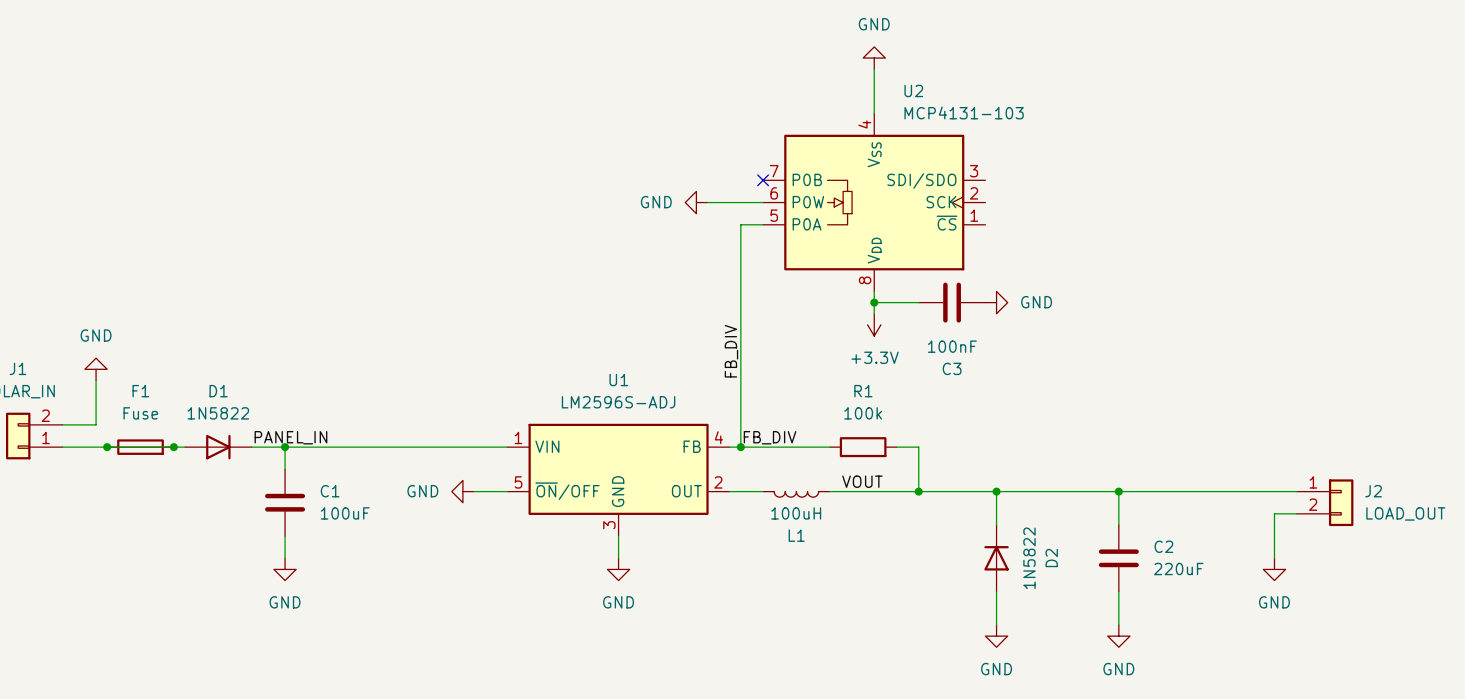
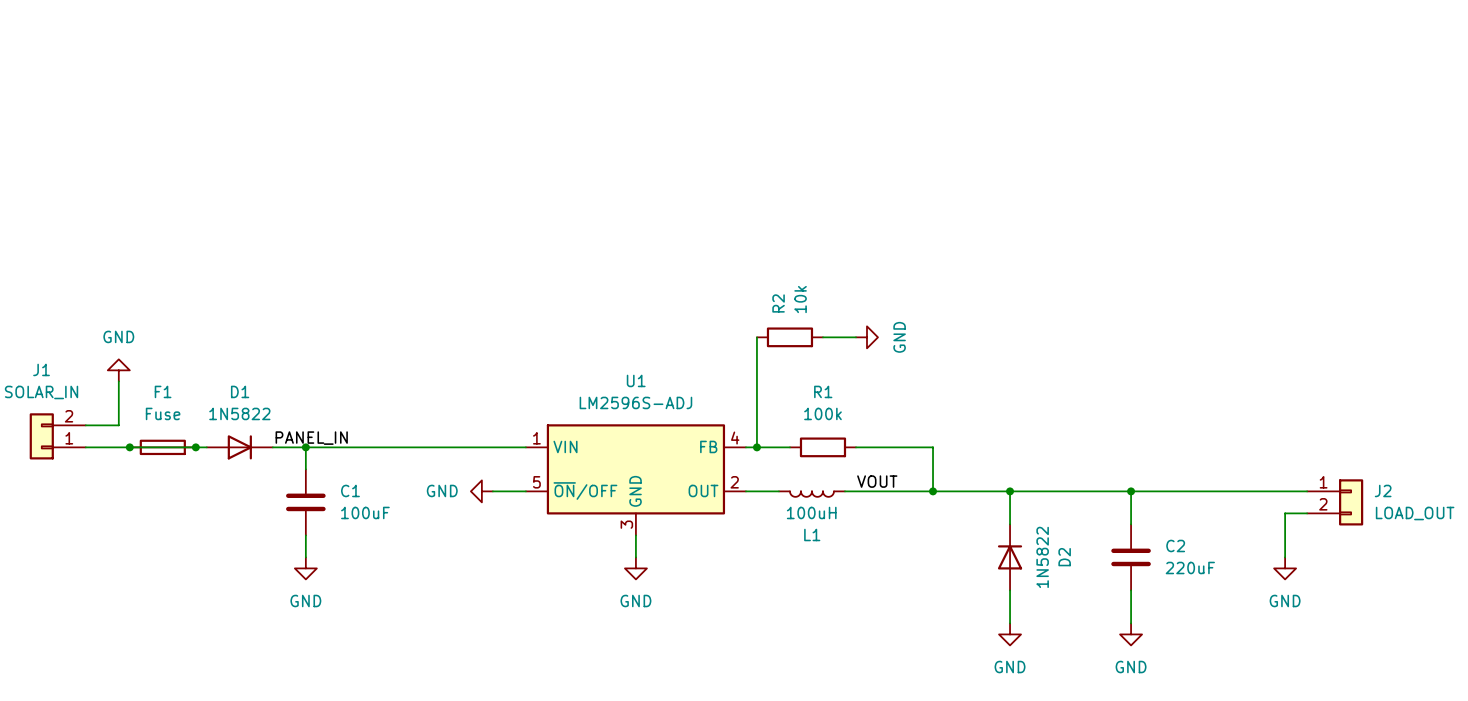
power symbol: GND (874, 58) -> none
wire: (874, 69) (874, 113) -> none
no-connect mark: (763, 180) -> none
power symbol: GND (696, 202) -> none
wire: (707, 202) (763, 202) -> none
U2: MCP4131-103 (874, 202) -> none
wire: (763, 224) (740, 224) (740, 335) -> none
wire: (874, 291) (874, 313) -> none
wire: (874, 302) (918, 302) -> none
junction: (874, 302) -> none
C3: 100nF (952, 302) -> none
power symbol: GND (996, 302) -> none
power symbol: +3.3V (874, 324) -> none
R2: none -> 10k (789, 337)
wire: none -> (822, 337) (855, 337)
power symbol: none -> GND (866, 337)
label: FB_DIV (731, 351) -> none
label: FB_DIV (770, 437) -> none
wire: (774, 447) (829, 447) -> (855, 447) (911, 447)
R1 position: (863, 447) -> (822, 447)

